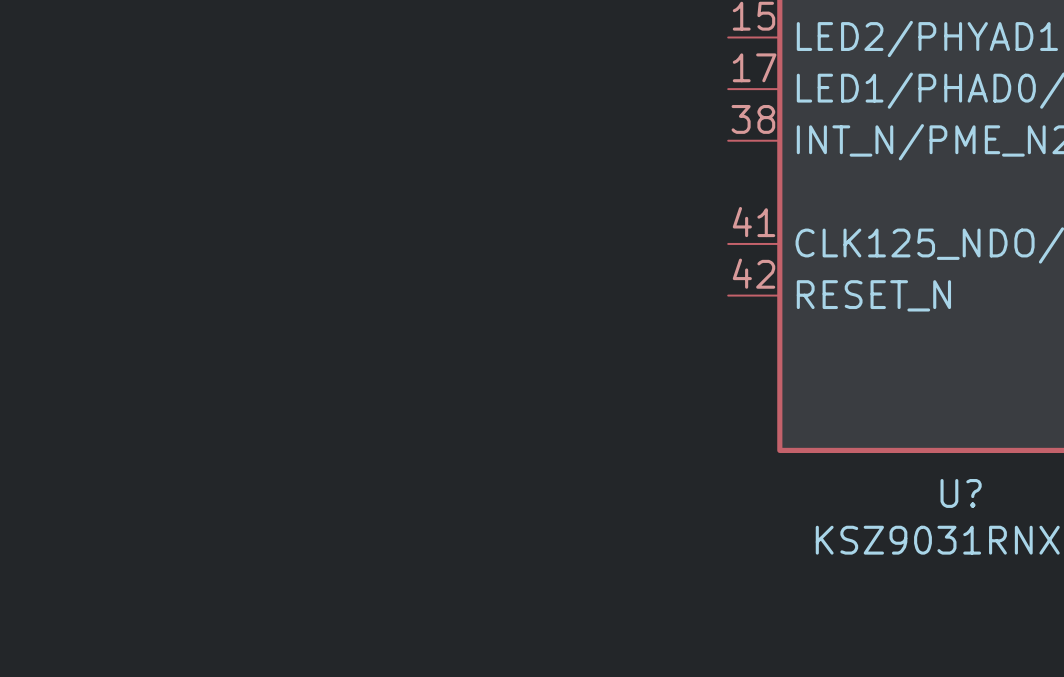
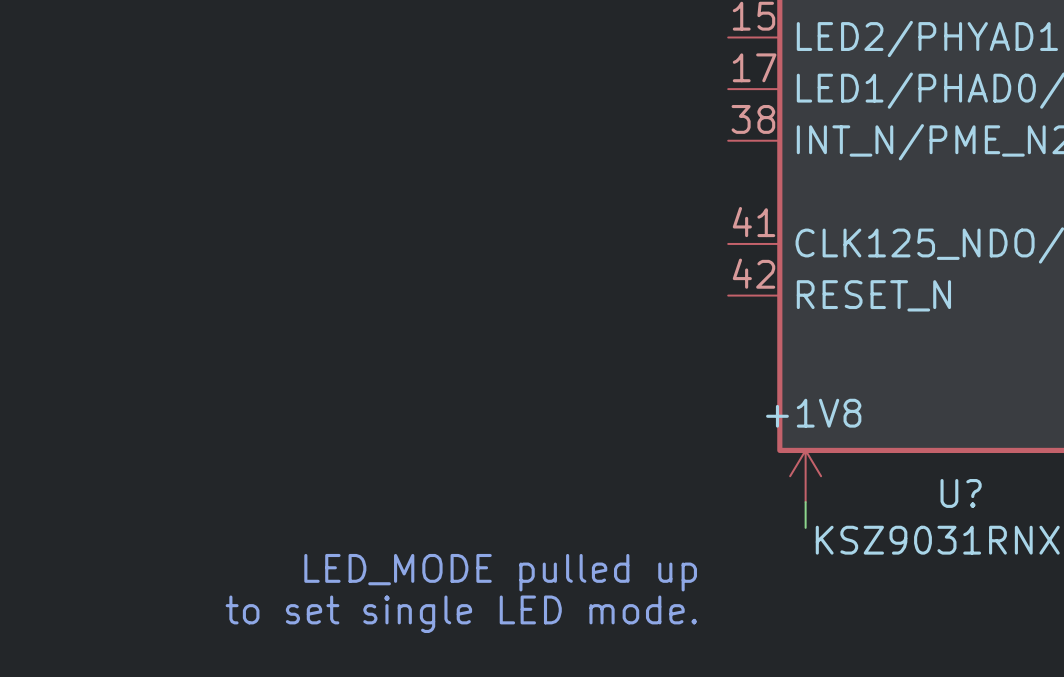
power symbol: none -> +1V8 (805, 476)
wire: none -> (805, 502) (805, 527)
text: none -> LED_MODE pulled up (500, 572)
text: none -> to set single LED mode. (461, 614)

